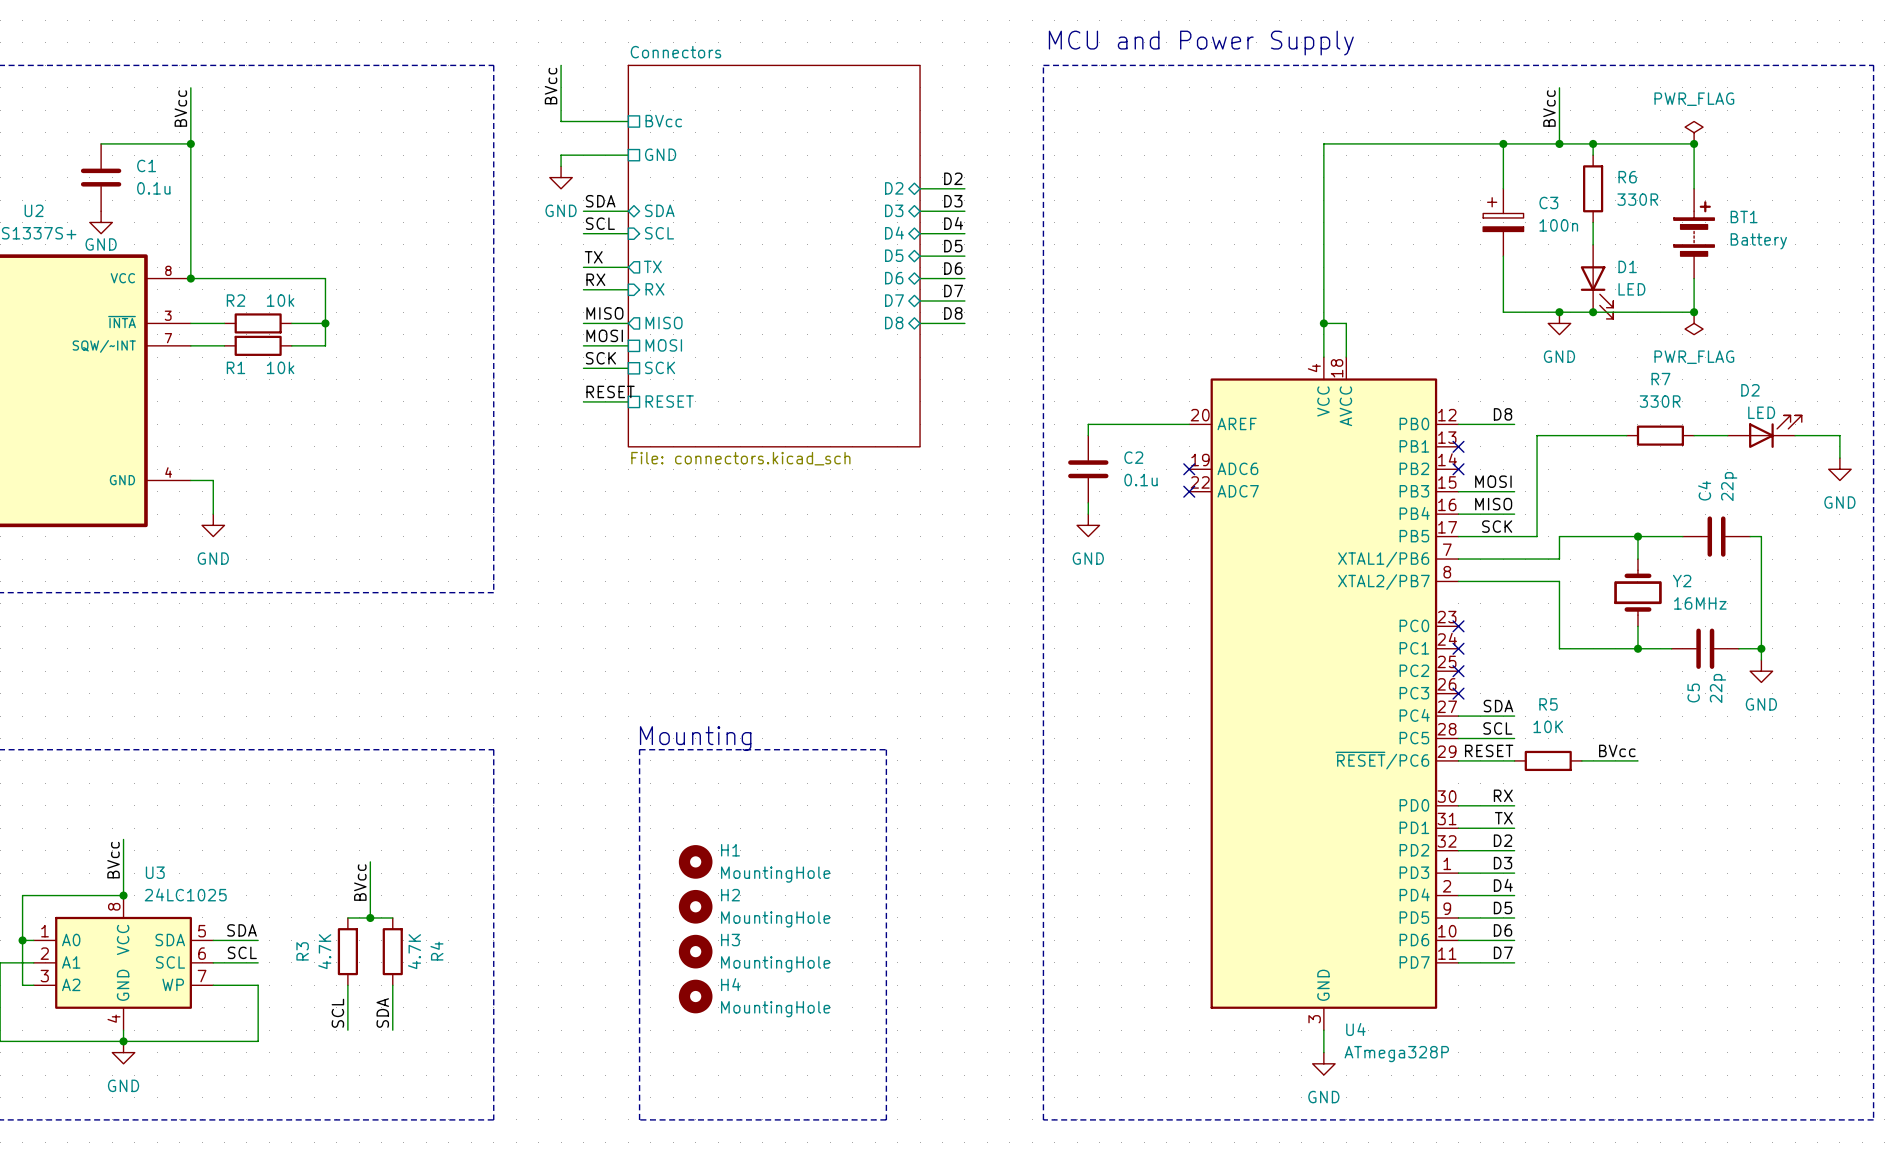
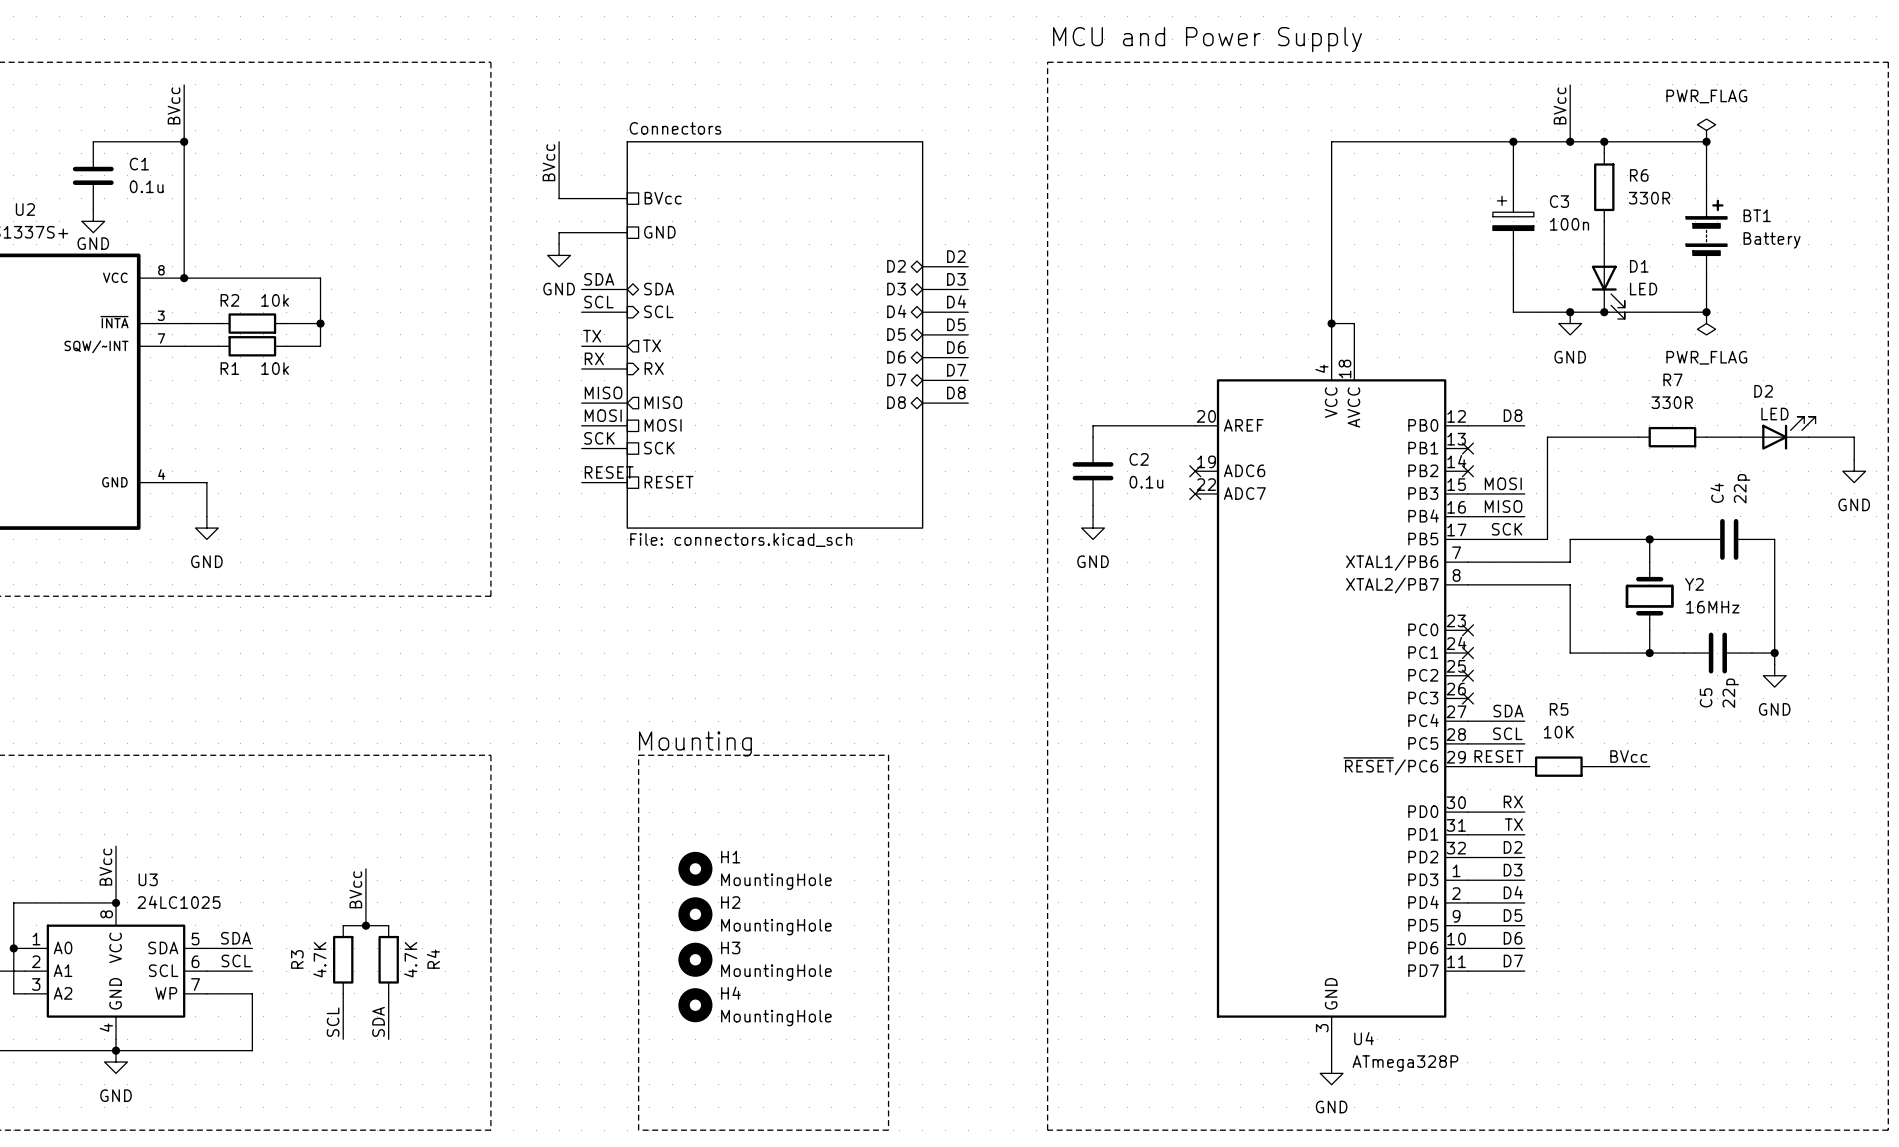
wire: (561, 65) (561, 121) (628, 121) -> none
label position: BVcc (551, 86) -> BVcc (548, 162)
sheet pin position: BVcc (663, 121) -> BVcc (663, 198)
sheet pin: GND (660, 154) -> none
wire: (561, 155) (628, 155) -> (559, 153) (559, 141)
wire: none -> (559, 164) (559, 198) (627, 198)
power symbol position: GND (561, 177) -> GND (559, 255)
label position: D2 (953, 178) -> D2 (956, 256)
sheet pin position: D2 (894, 188) -> D2 (896, 266)
wire: (920, 188) (964, 188) -> (922, 289) (968, 289)
label: SDA (600, 201) -> none
label position: D3 (953, 201) -> D3 (956, 279)
sheet pin: SDA (659, 210) -> none
sheet pin position: D3 (894, 210) -> D3 (896, 289)
wire: (583, 211) (628, 211) -> (581, 312) (627, 312)
wire: (920, 211) (964, 211) -> (922, 312) (968, 312)
label position: SCL (600, 223) -> SCL (598, 302)
label position: D4 (953, 223) -> D4 (956, 301)
wire: none -> (581, 232) (559, 232) (559, 244)
sheet pin shape: input (659, 233) -> passive (659, 232)
sheet pin: SCL (659, 233) -> GND (659, 232)
sheet pin position: D4 (894, 233) -> D4 (896, 311)
wire: (920, 233) (964, 233) -> (922, 334) (968, 334)
label position: D5 (953, 246) -> D5 (956, 324)
sheet pin position: D5 (894, 255) -> D5 (896, 334)
sheet Connectors position: (774, 256) -> (774, 334)
wire: (920, 256) (964, 256) -> (922, 357) (968, 357)
label: TX (593, 257) -> none
sheet pin: TX (652, 266) -> none
wire: (583, 267) (628, 267) -> (581, 482) (627, 482)
label position: D6 (953, 268) -> D6 (956, 347)
sheet pin position: D6 (894, 278) -> D6 (896, 357)
wire: (920, 278) (964, 278) -> (922, 380) (968, 380)
label: RX (595, 279) -> SDA (599, 279)
sheet pin shape: input (654, 289) -> bidirectional (659, 289)
sheet pin: RX (654, 289) -> SDA (659, 289)
label position: D7 (953, 290) -> D7 (956, 370)
sheet pin position: D7 (894, 300) -> D7 (896, 379)
wire: (920, 300) (964, 300) -> (922, 403) (968, 403)
sheet pin: none -> SCL (658, 311)
label: MISO (604, 313) -> none
label position: D8 (953, 313) -> D8 (956, 392)
wire: (583, 323) (628, 323) -> (581, 425) (627, 425)
sheet pin: MISO (664, 323) -> none
sheet pin position: D8 (894, 323) -> D8 (896, 402)
wire: (920, 323) (964, 323) -> (922, 266) (968, 266)
label: MOSI (604, 335) -> TX (592, 336)
sheet pin shape: passive (663, 345) -> output (652, 345)
sheet pin: MOSI (663, 345) -> TX (652, 345)
label: SCK (600, 358) -> RX (594, 358)
sheet pin shape: passive (660, 367) -> input (654, 368)
sheet pin: SCK (660, 367) -> RX (654, 368)
label: RESET (610, 391) -> MISO (603, 392)
sheet pin shape: passive (669, 401) -> output (663, 402)
sheet pin: RESET (669, 401) -> MISO (663, 402)
label: none -> MOSI (603, 415)
sheet pin: none -> MOSI (663, 425)
label: none -> SCK (599, 438)
wire: none -> (581, 448) (627, 448)
sheet pin: none -> SCK (659, 448)
label: none -> RESET (609, 472)
sheet pin: none -> RESET (669, 482)

